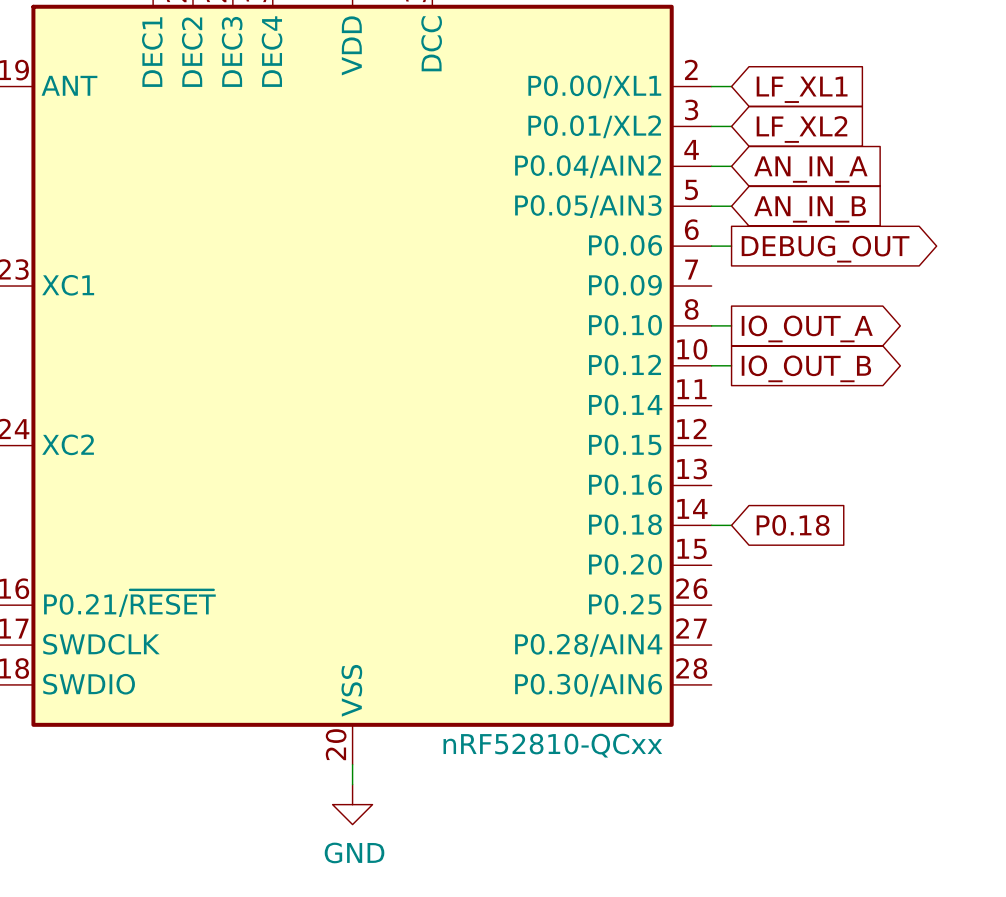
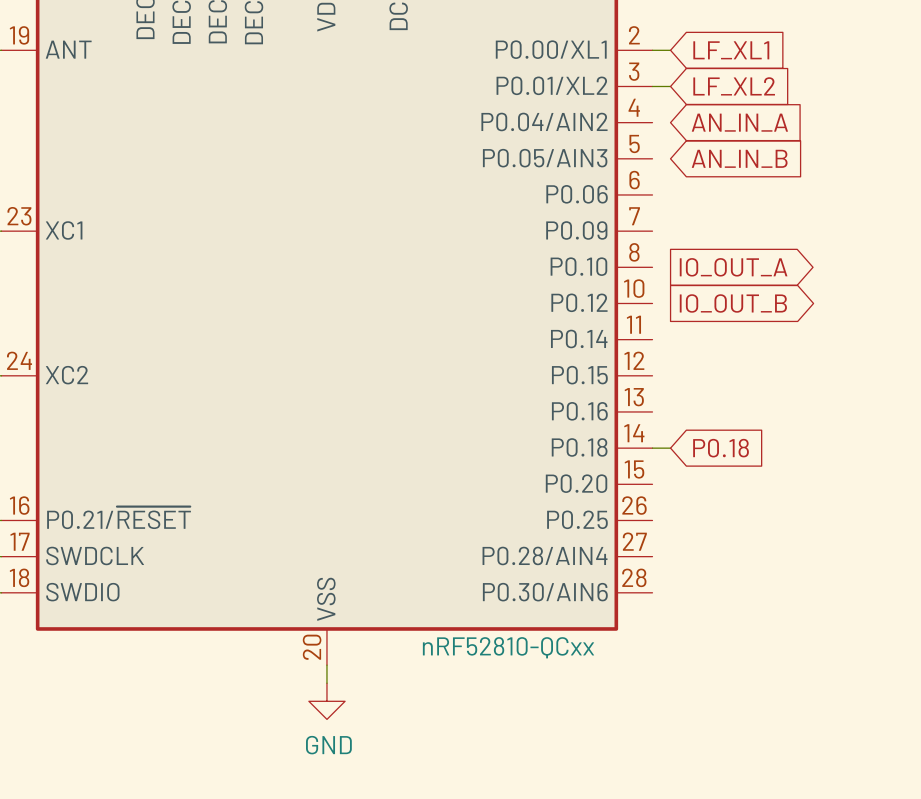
wire: (711, 166) (731, 166) -> none
wire: (711, 206) (731, 206) -> none
wire: (711, 246) (731, 246) -> none
global label: DEBUG_OUT (825, 249) -> none
wire: (711, 325) (731, 325) -> none
wire: (711, 365) (731, 365) -> none

